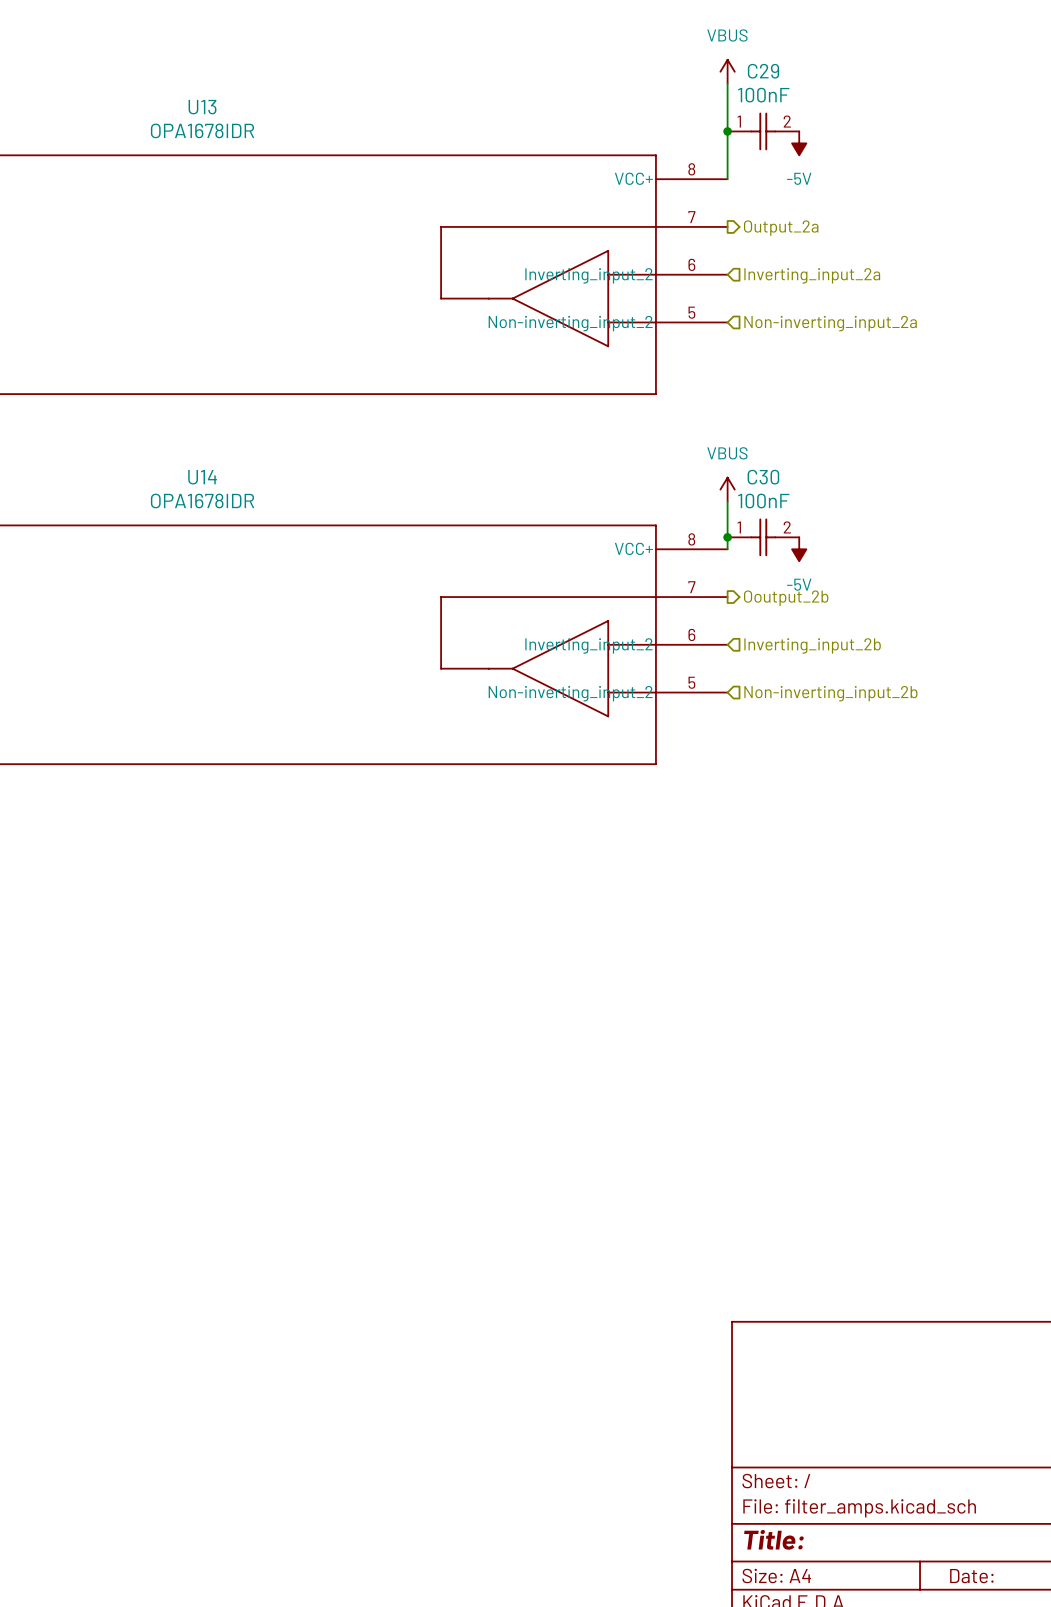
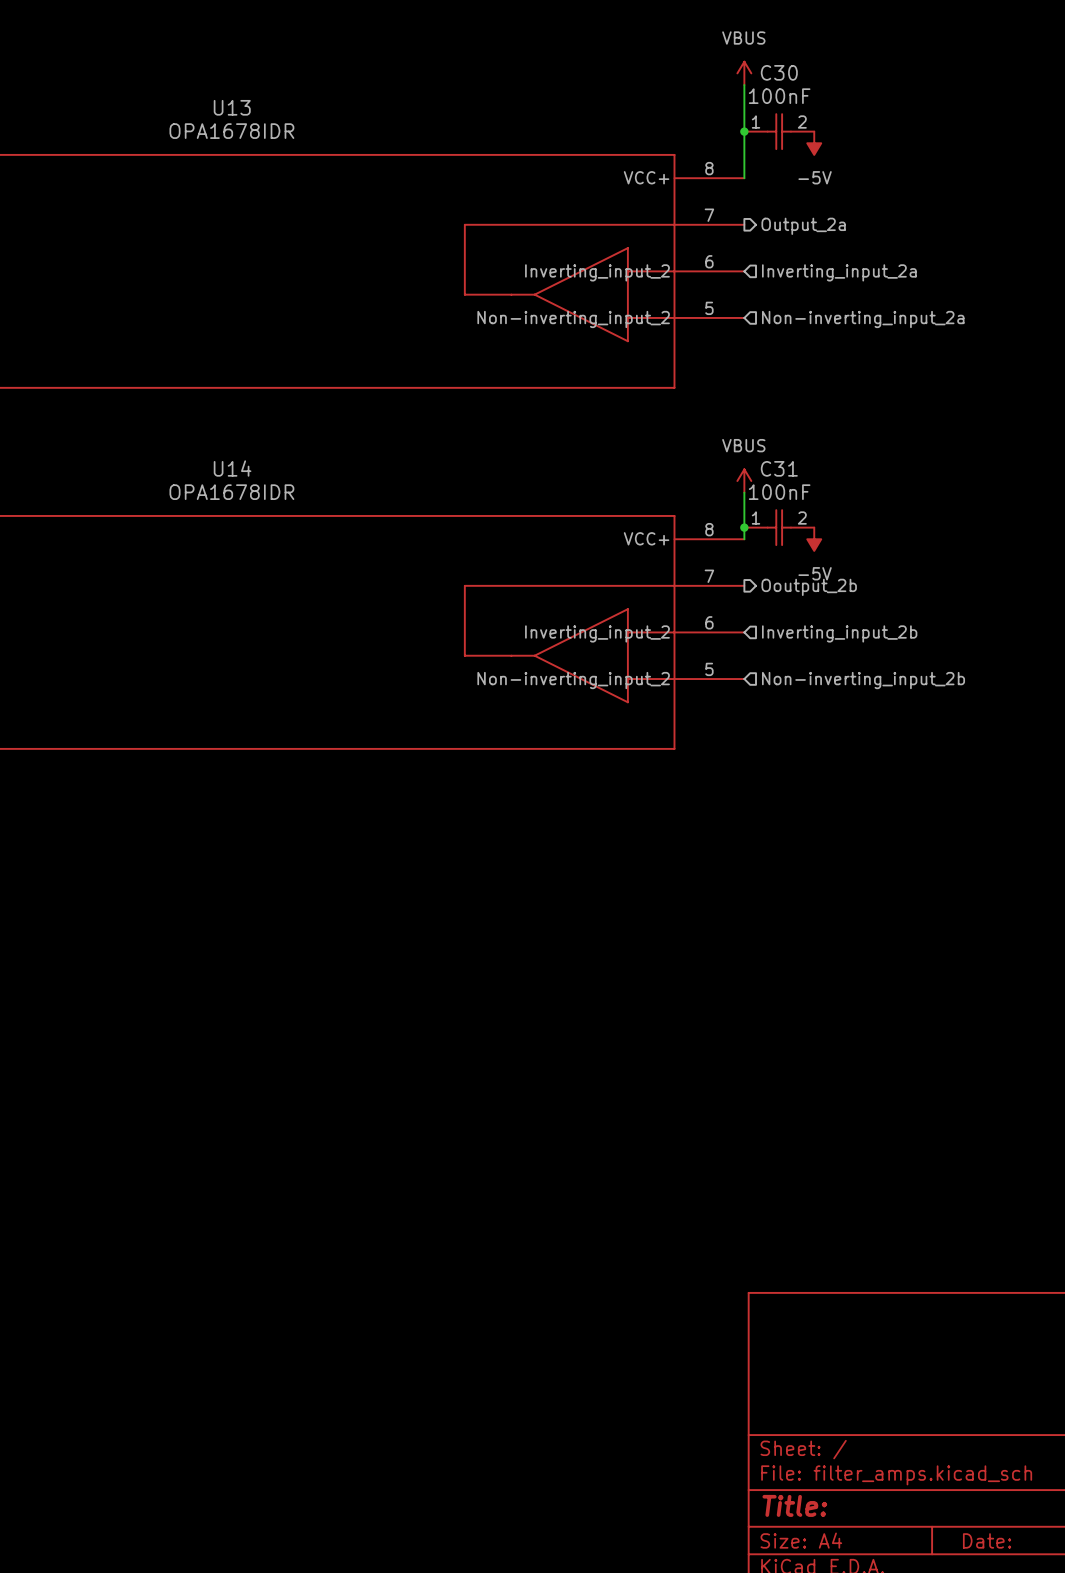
C29 name: C29 (763, 71) -> C30 (779, 72)
C30 name: C30 (763, 477) -> C31 (779, 468)

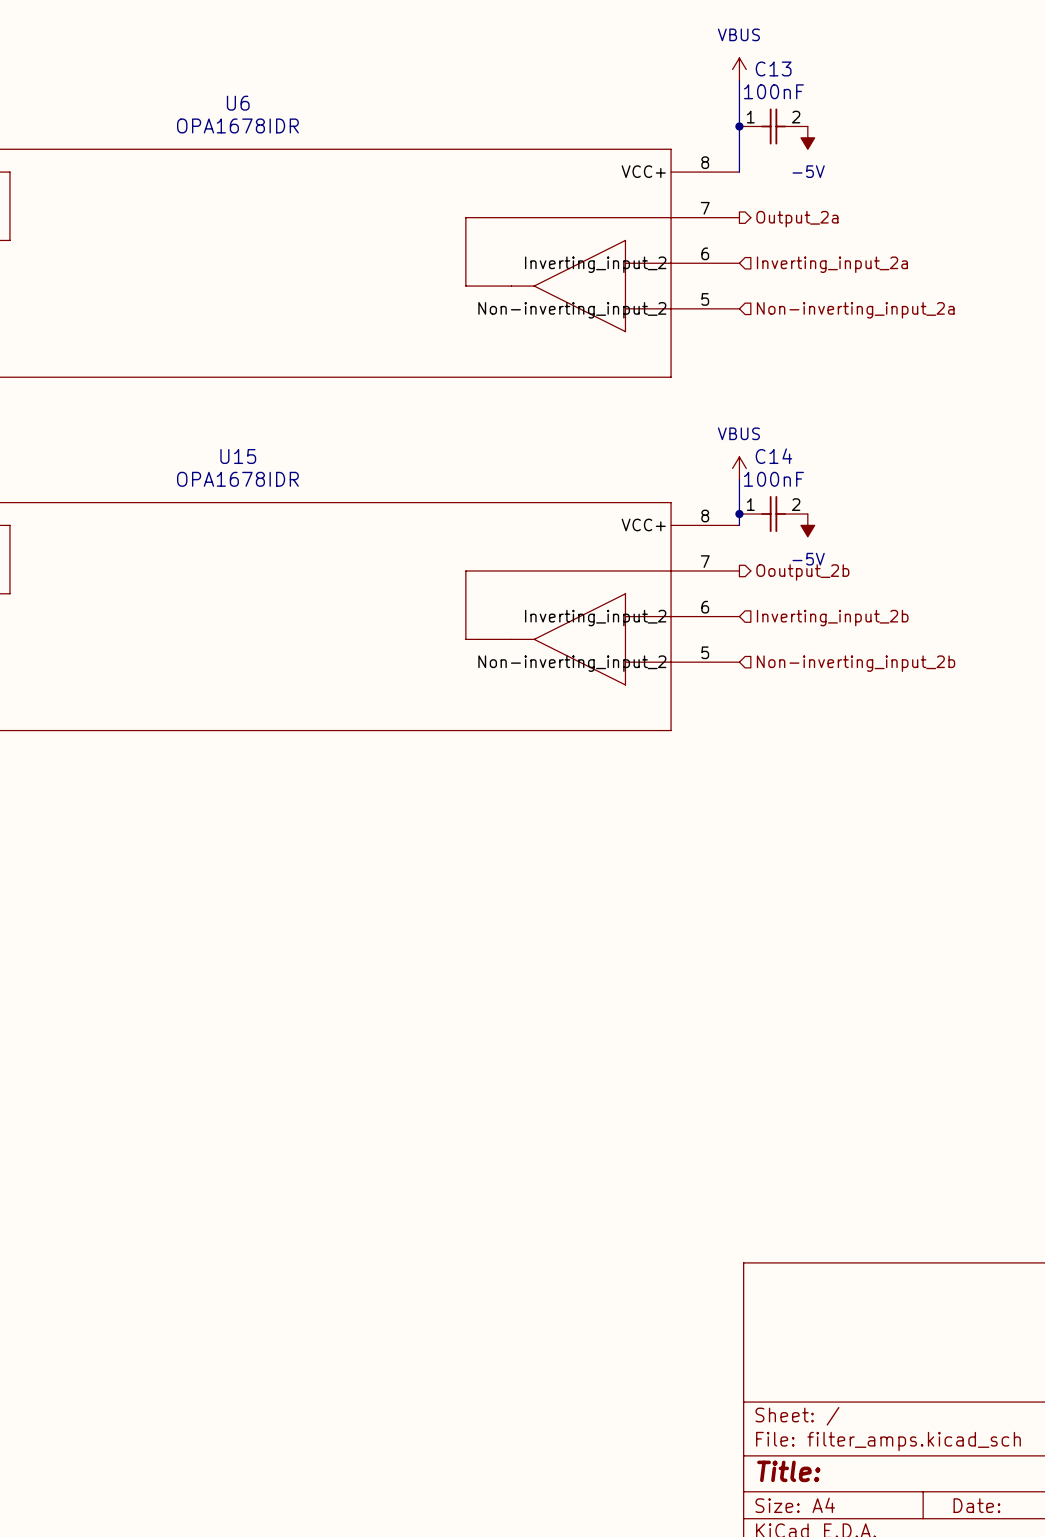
C30 name: C30 (779, 72) -> C13 (773, 68)
U13 name: U13 (232, 107) -> U6 (238, 103)
U14 name: U14 (232, 468) -> U15 (238, 456)
C31 name: C31 (779, 468) -> C14 (773, 456)

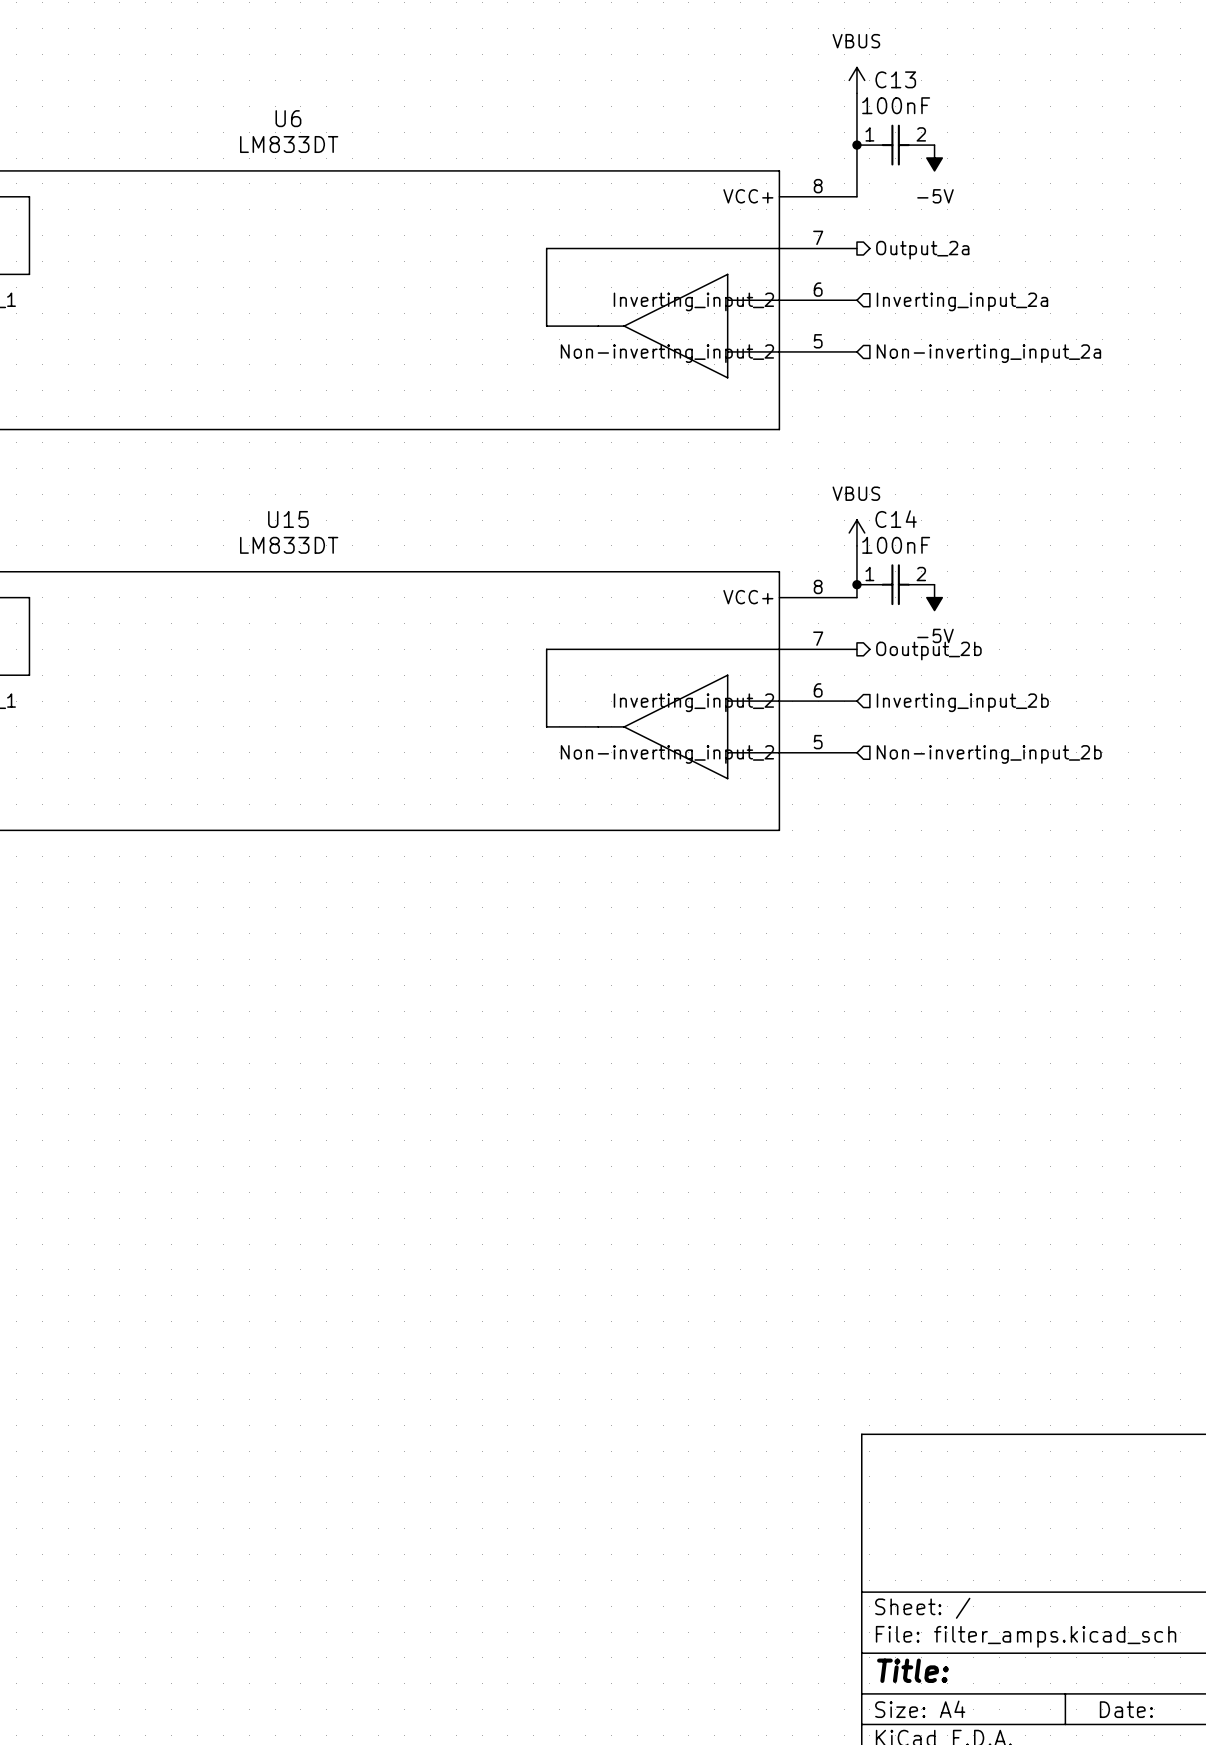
U6 value: OPA1678IDR (237, 125) -> LM833DT (289, 144)
U15 value: OPA1678IDR (237, 479) -> LM833DT (289, 545)

